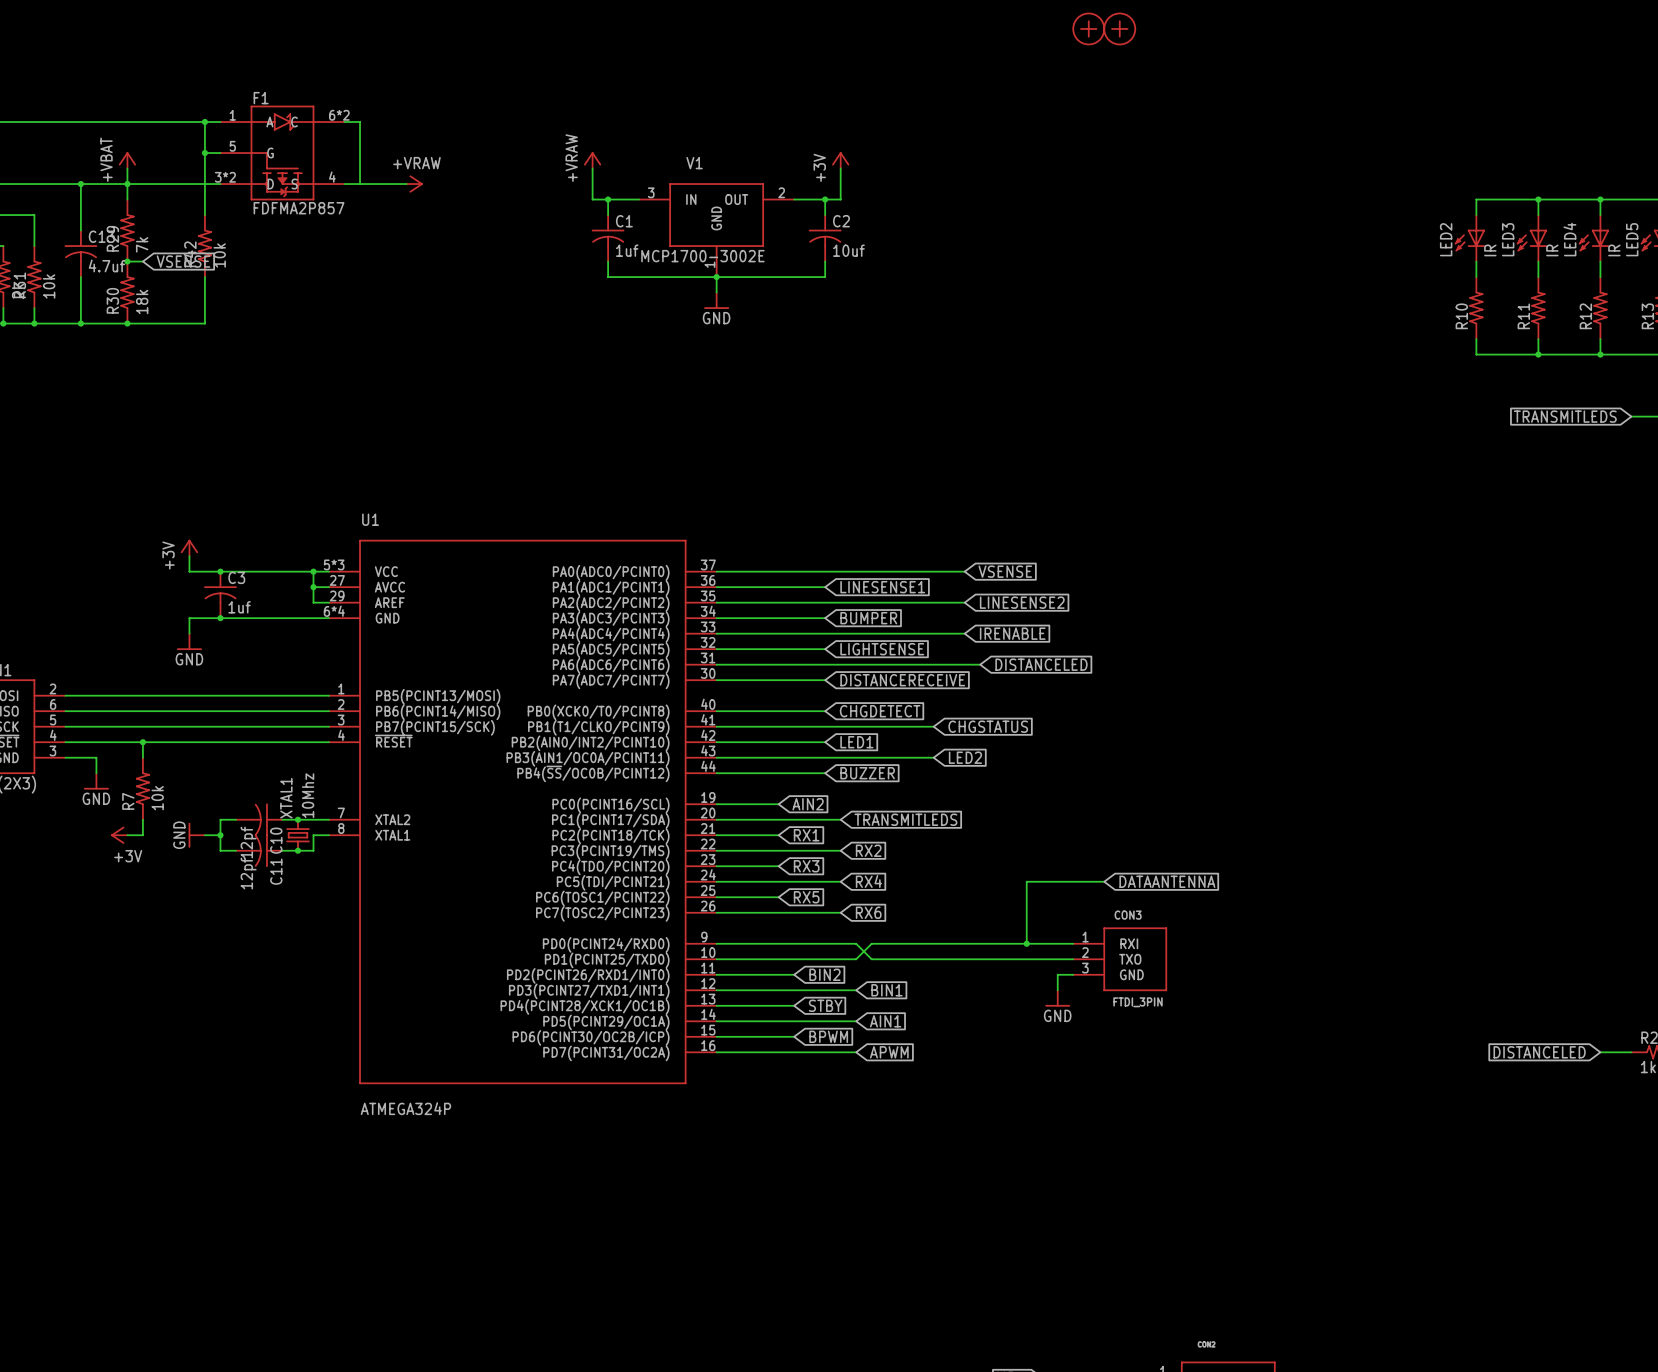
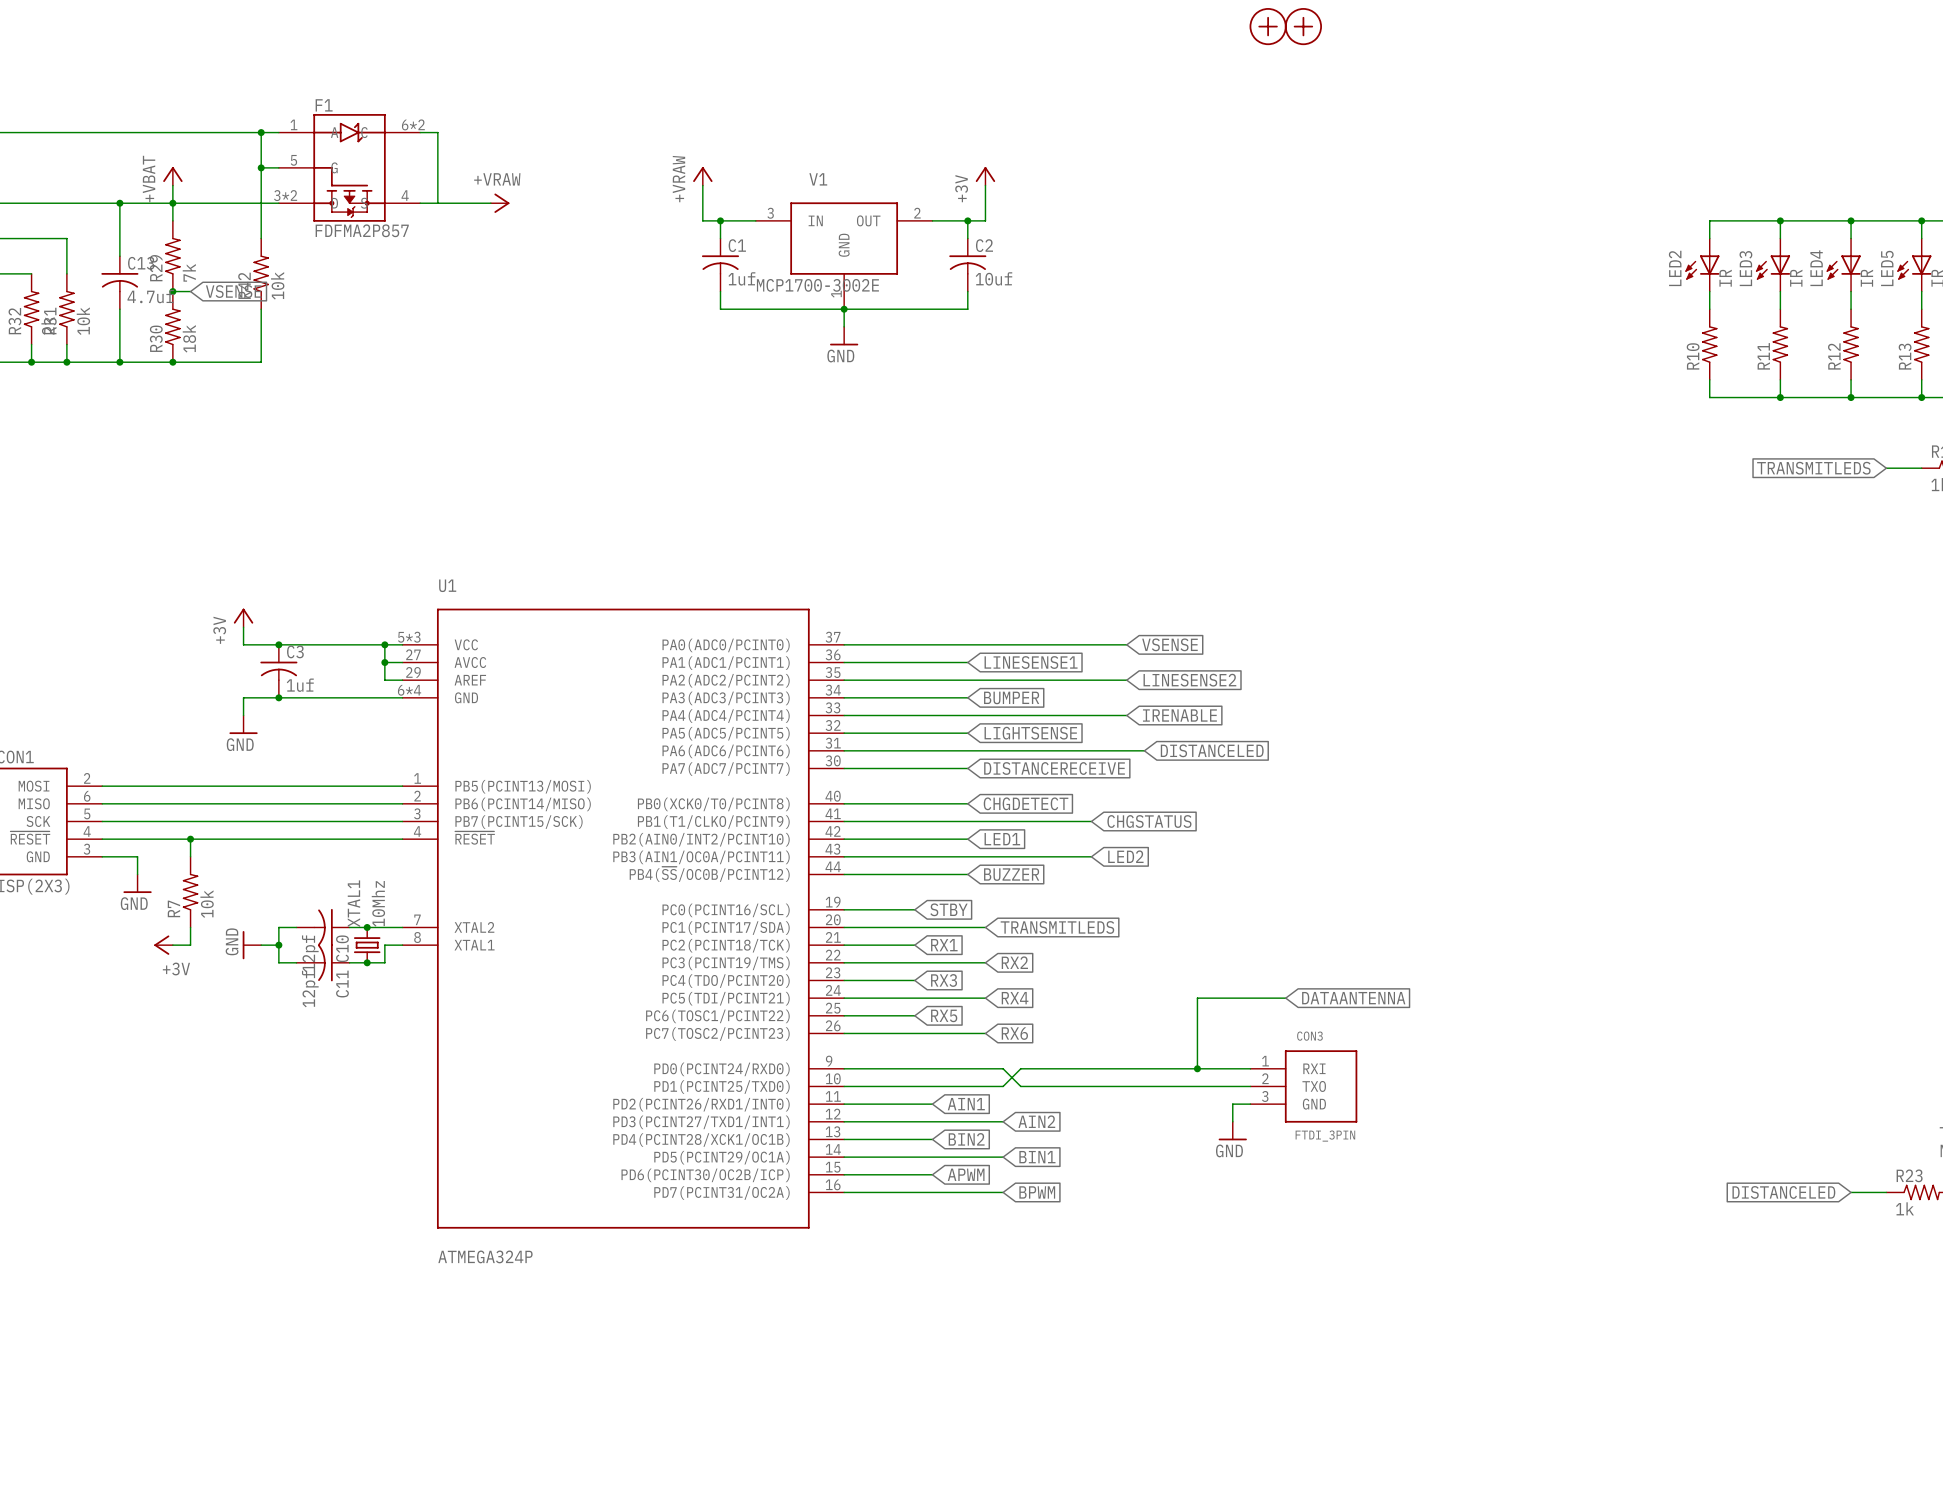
global label: AIN2 (808, 804) -> STBY (949, 909)
global label: BIN2 (824, 974) -> AIN1 (966, 1104)
global label: BIN1 (886, 990) -> AIN2 (1036, 1121)
global label: STBY (825, 1005) -> BIN2 (966, 1139)
global label: AIN1 (885, 1021) -> BIN1 (1037, 1157)
global label: BPWM (828, 1036) -> APWM (966, 1174)
global label: APWM (889, 1052) -> BPWM (1037, 1192)

